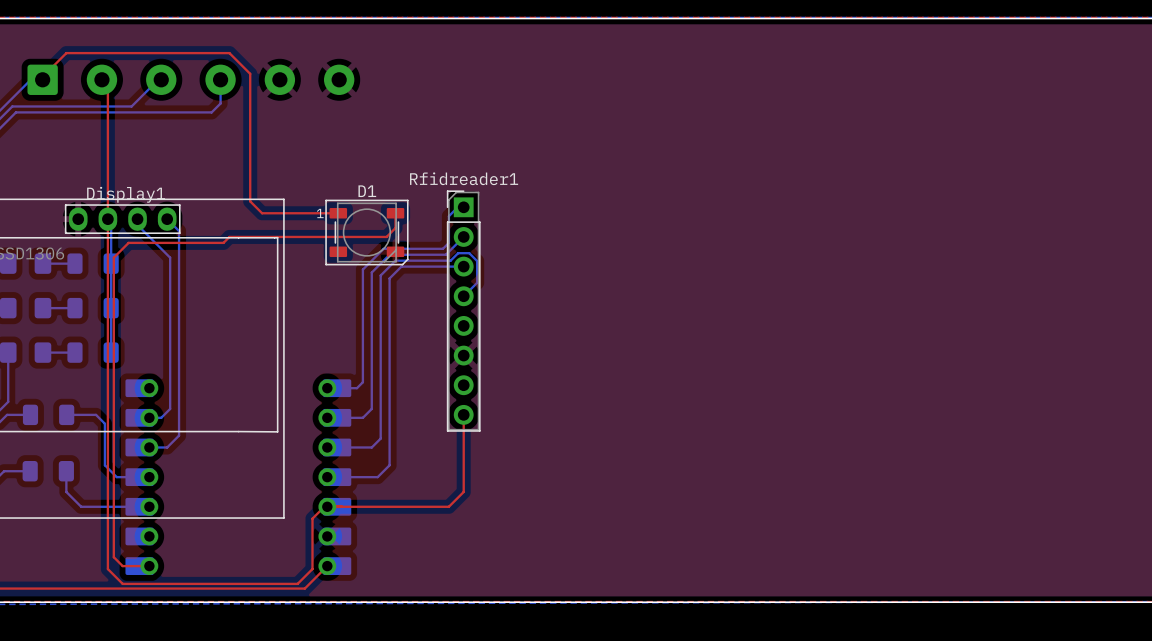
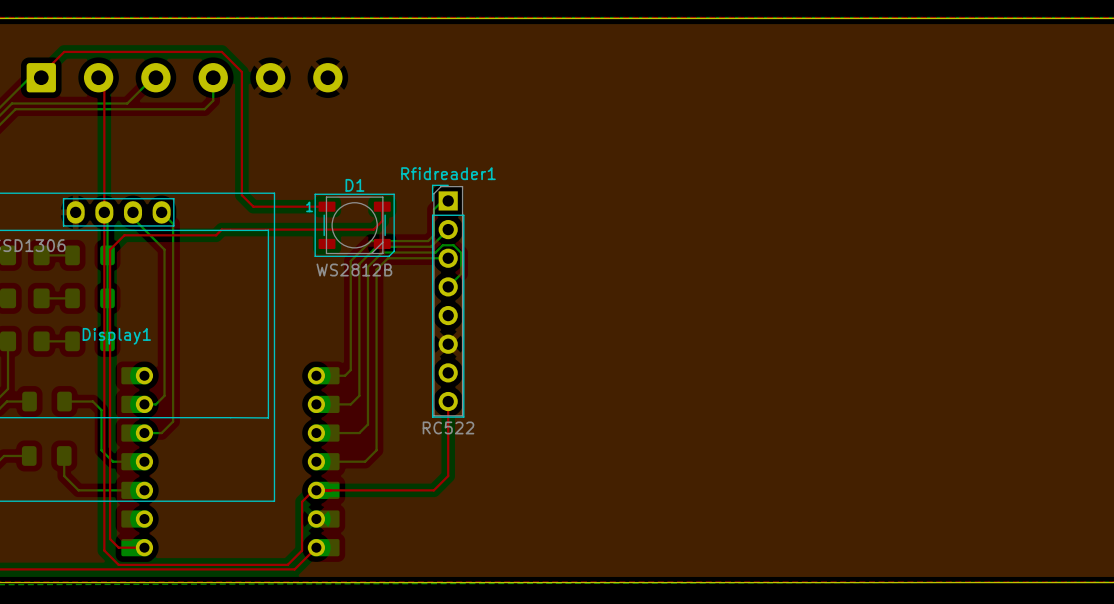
Display1 name position: Display1 (126, 194) -> Display1 (116, 336)
D1 value: none -> WS2812B (354, 270)
Rfidreader1 value: none -> RC522 (448, 427)

